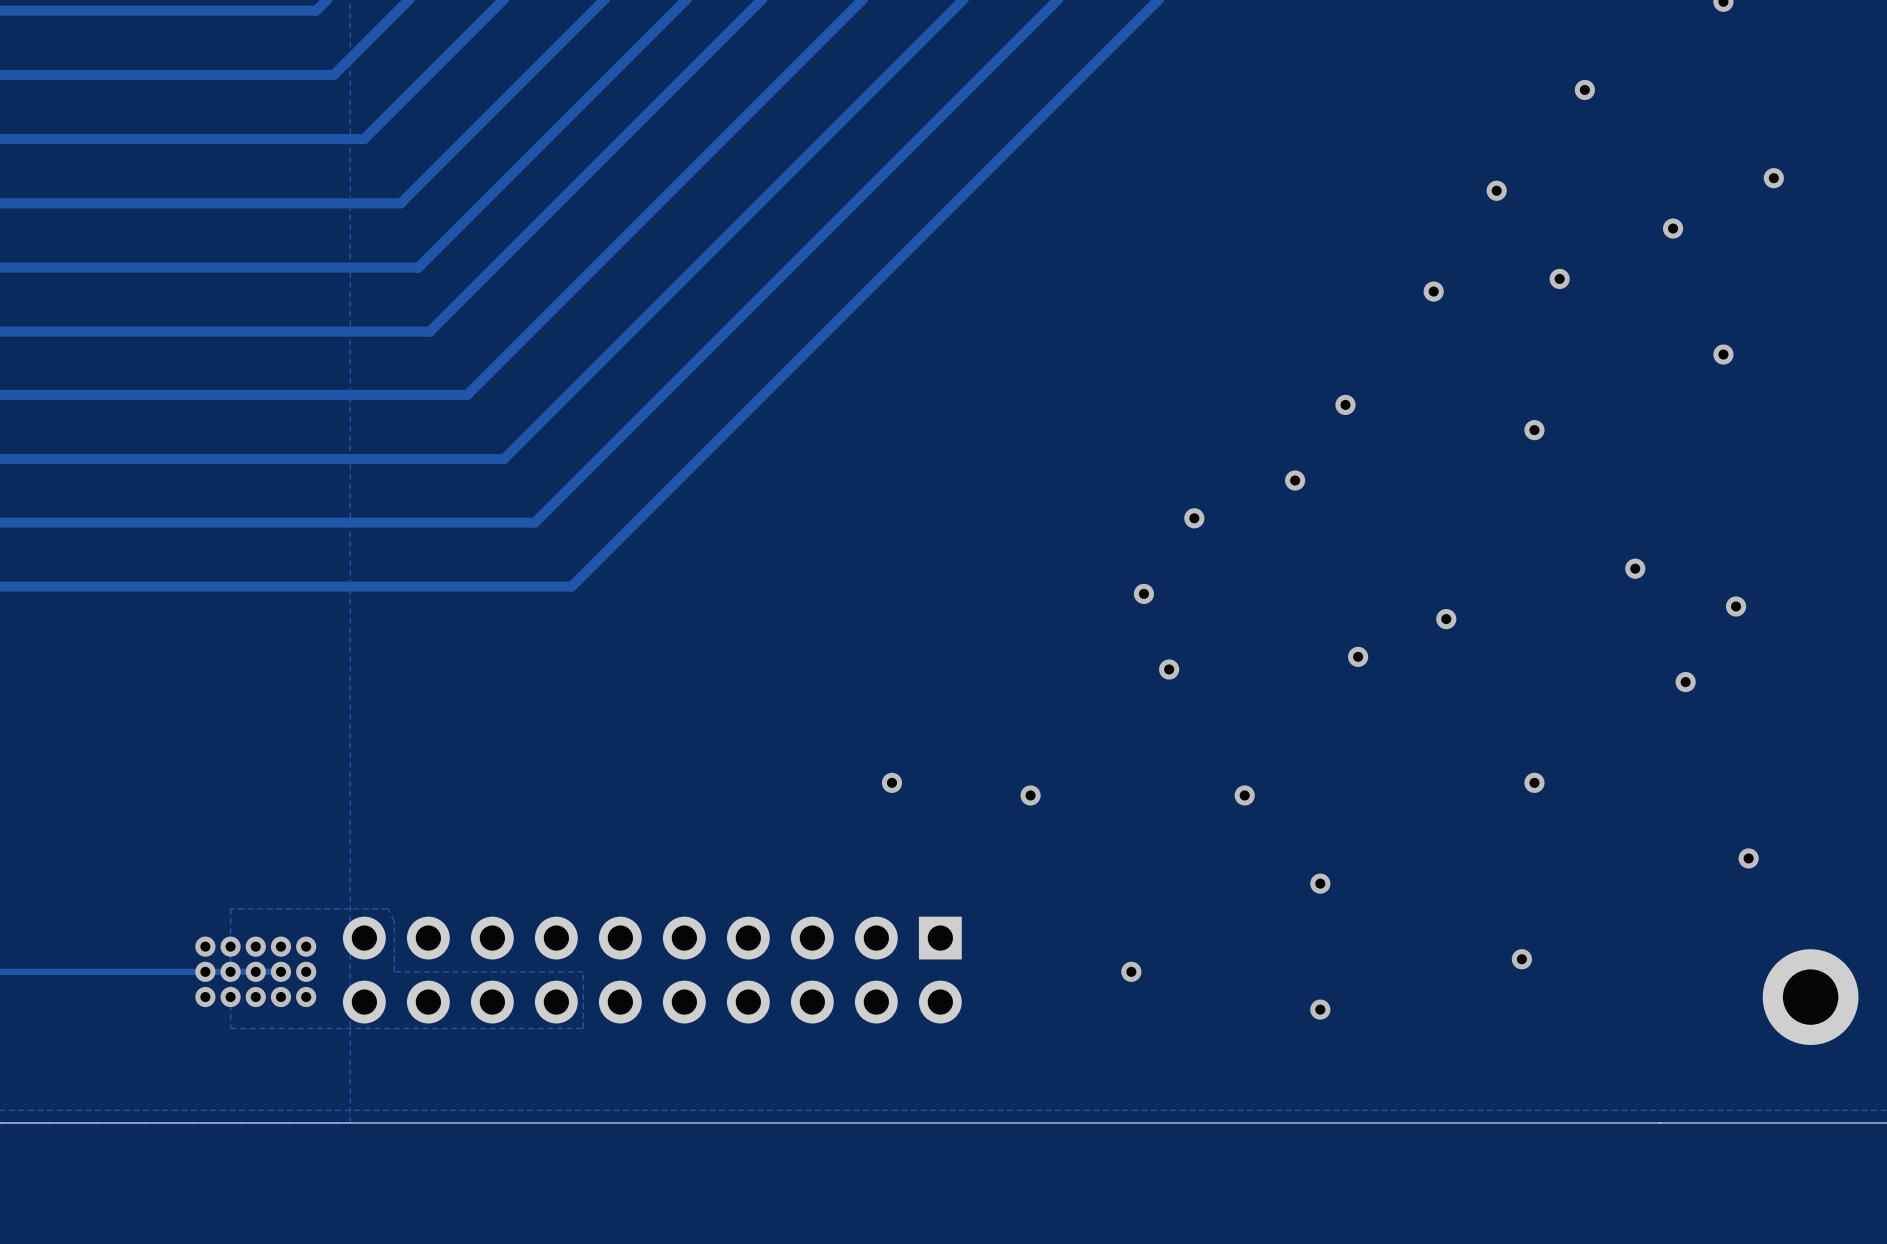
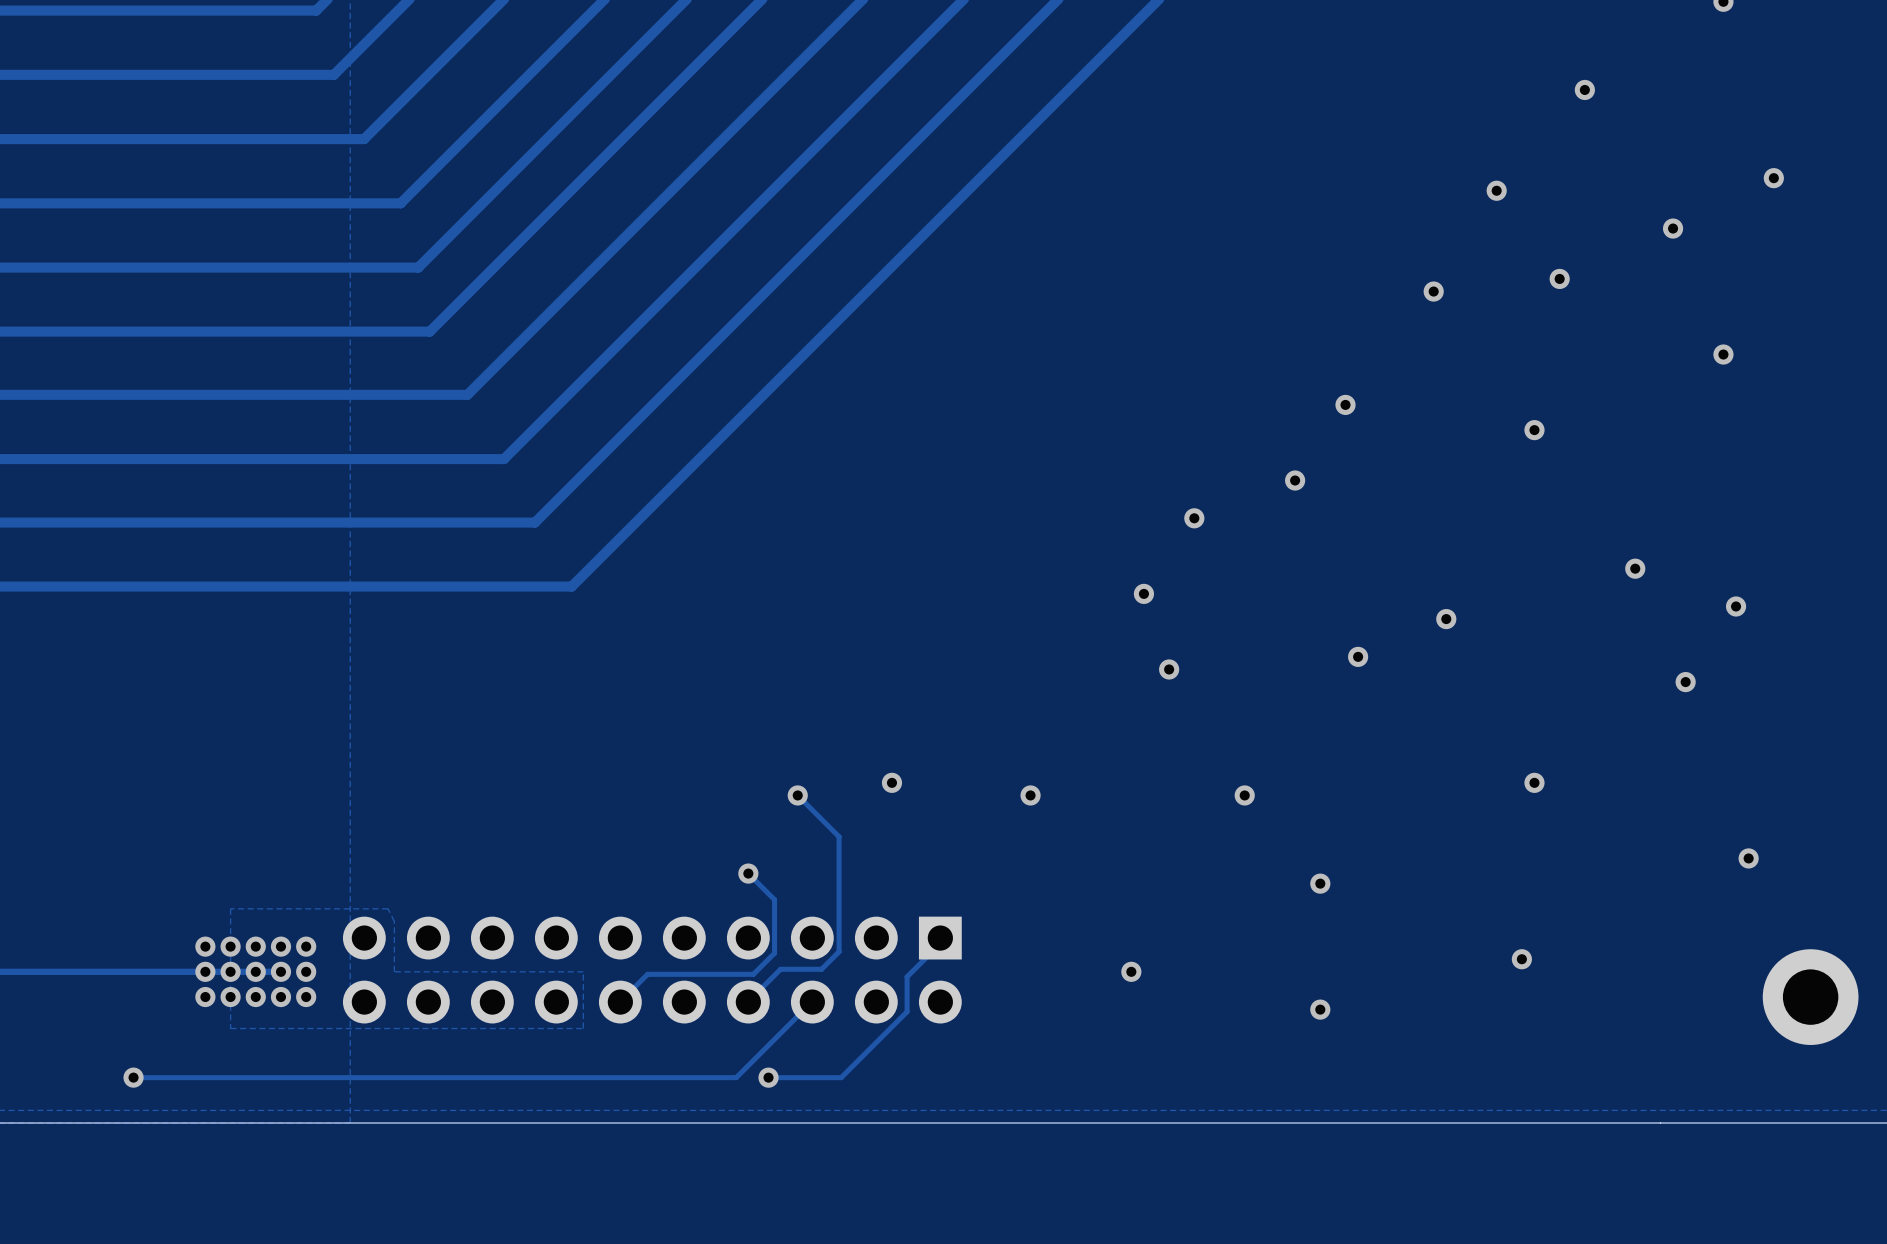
track: none -> (797, 795) (839, 836) (839, 951) (821, 969) (780, 969) (745, 1004)
via: none -> (797, 795)
track: none -> (748, 873) (774, 899) (774, 953) (753, 974) (647, 974) (617, 1004)
via: none -> (748, 873)
track: none -> (937, 940) (937, 946) (907, 976) (907, 1011) (841, 1077) (768, 1077)
track: none -> (809, 1004) (736, 1077) (133, 1077)
via: none -> (133, 1077)
via: none -> (768, 1077)

